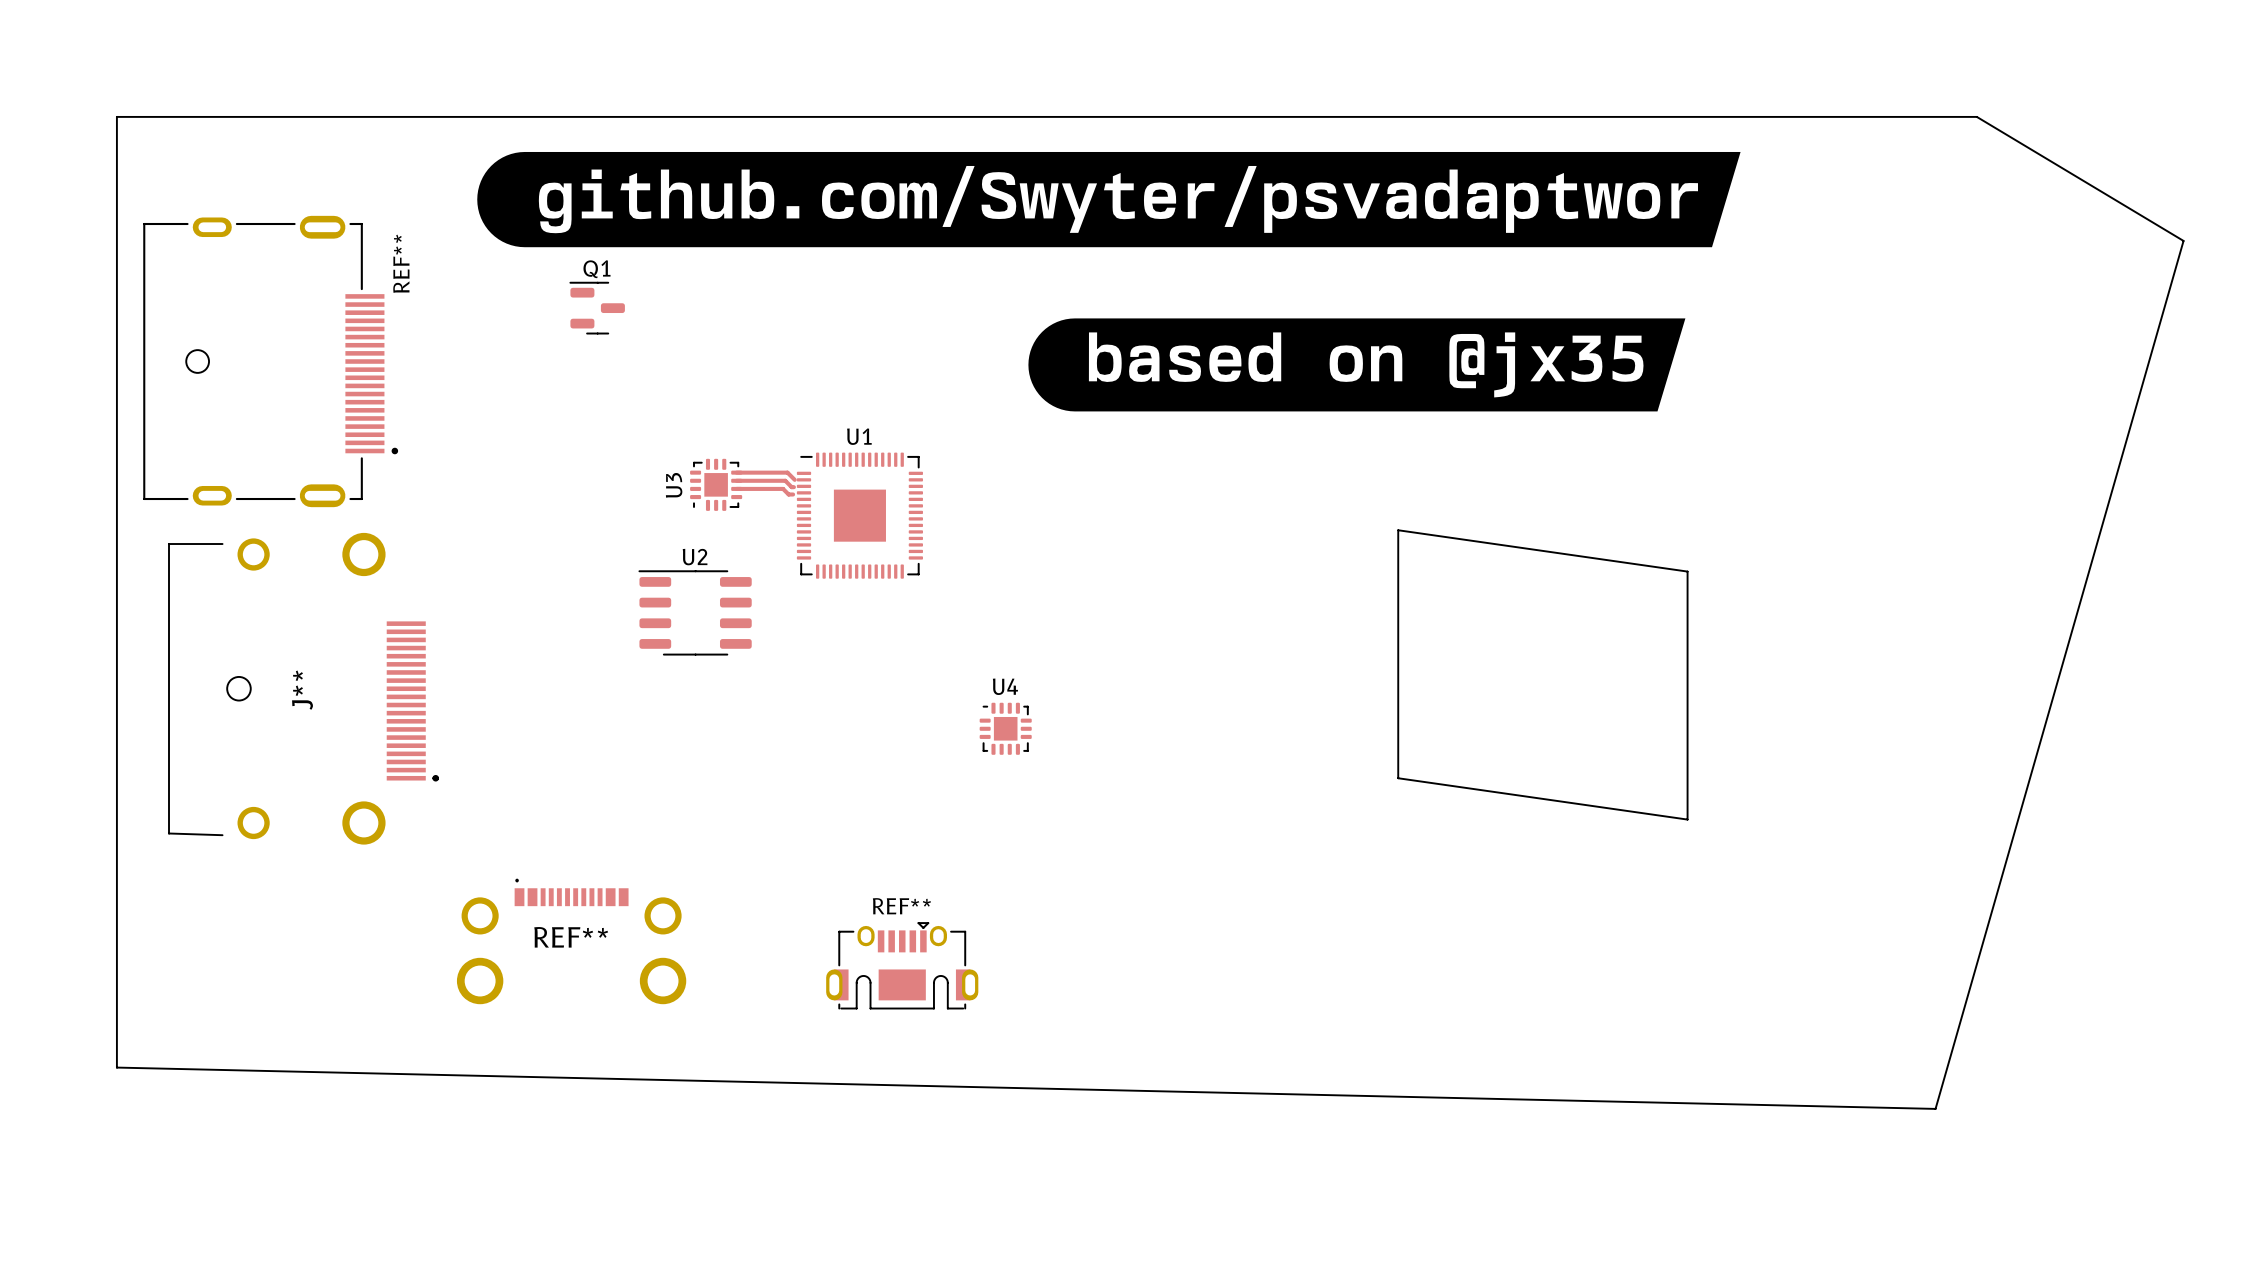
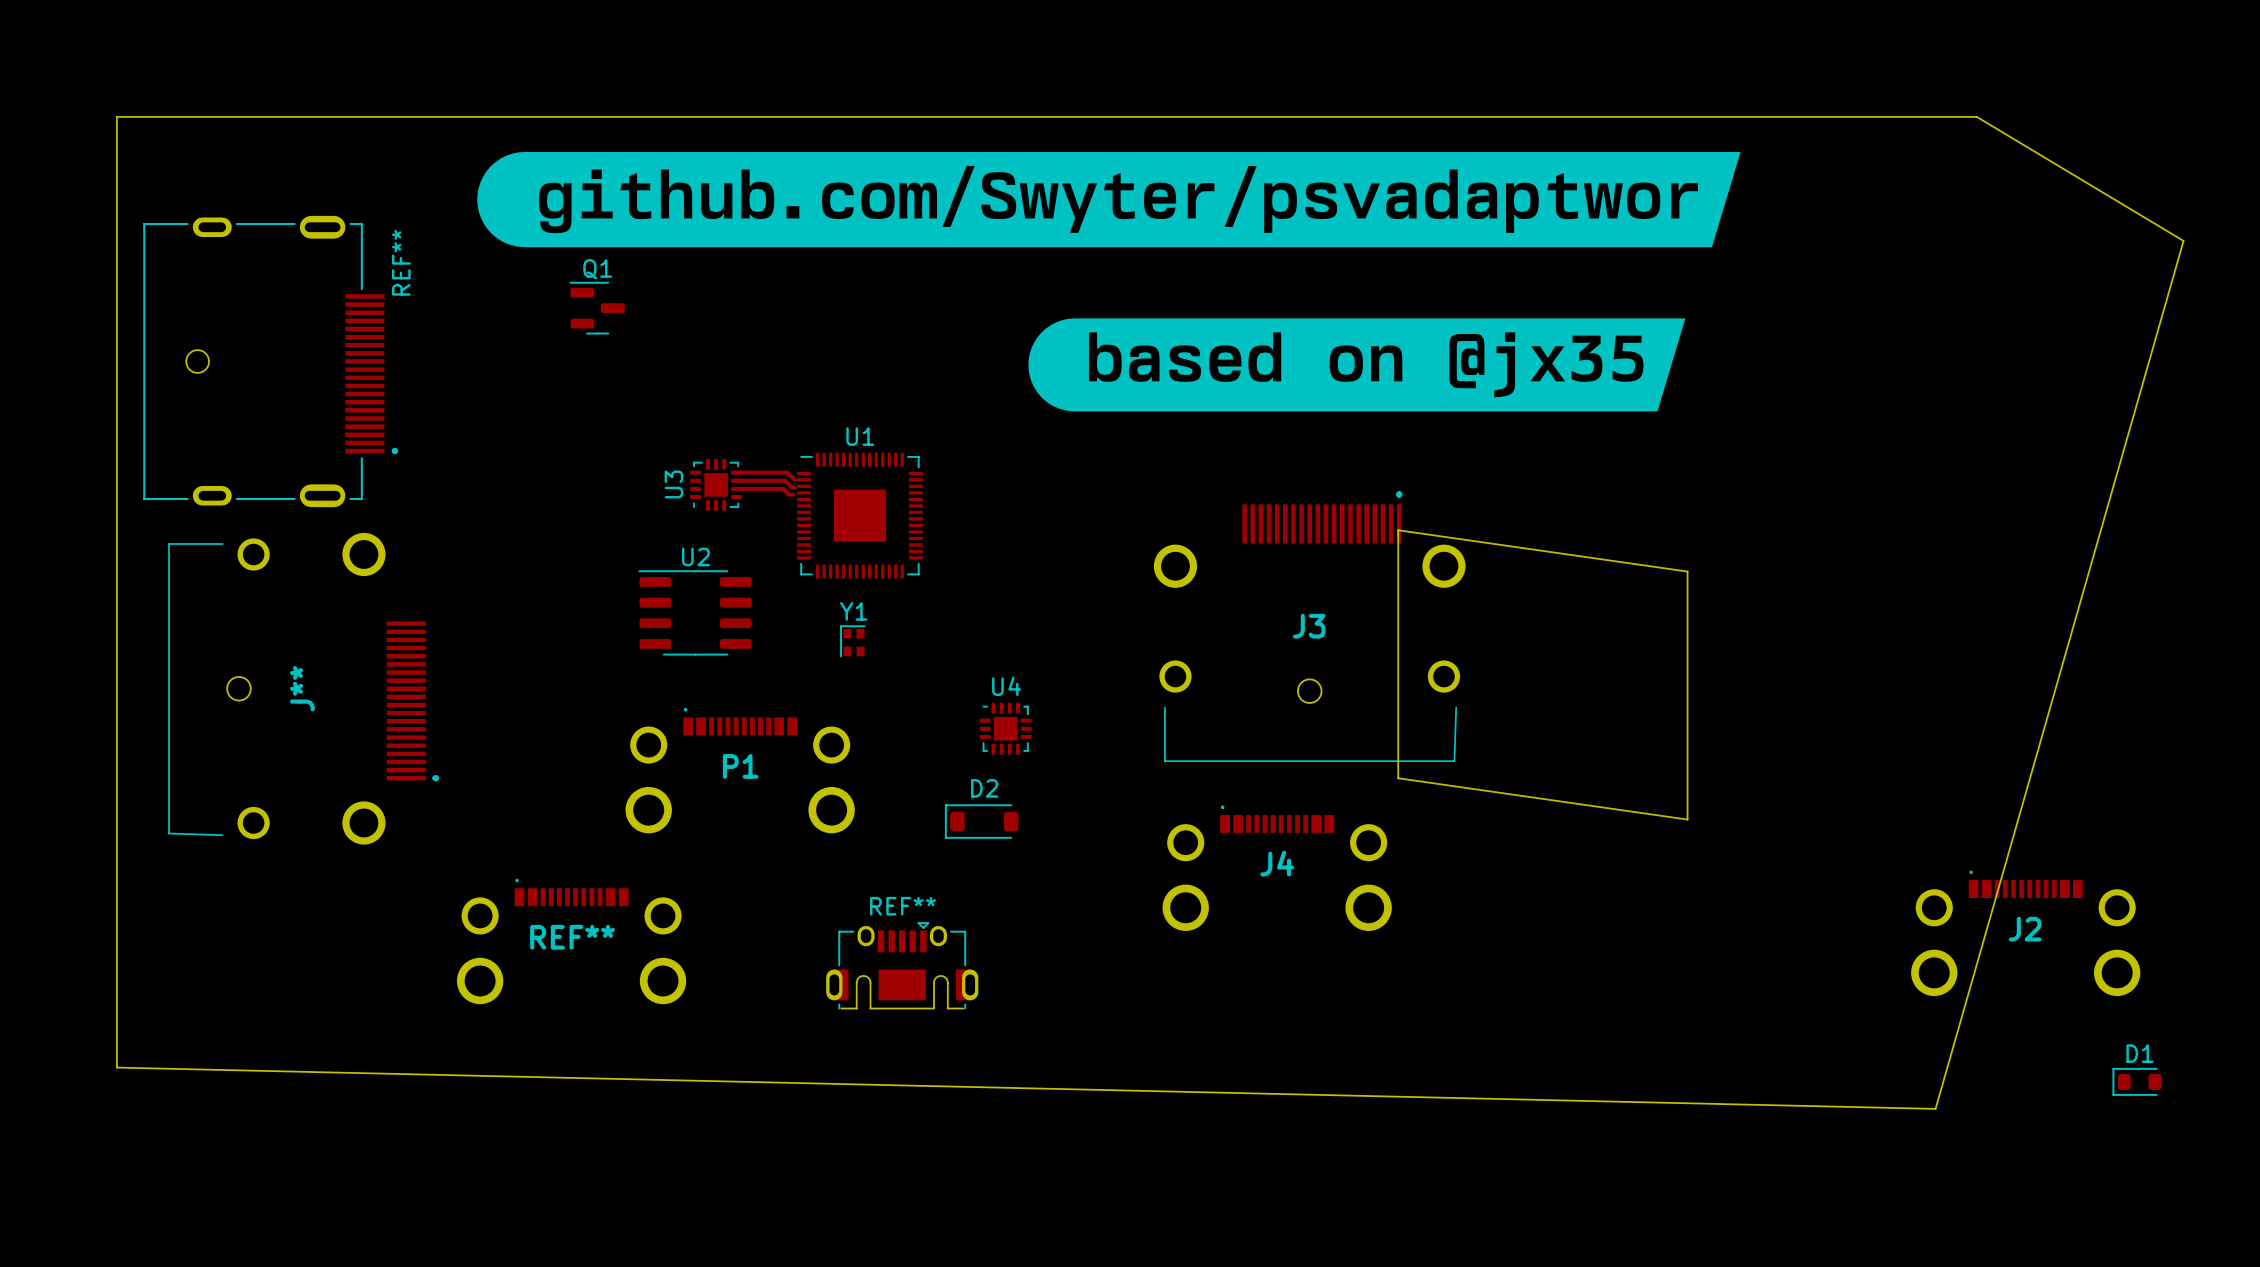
J3: none -> (1309, 626)
Y1: none -> (852, 641)
P1: none -> (740, 770)
D2: none -> (981, 821)
J4: none -> (1277, 868)
J2: none -> (2025, 933)
D1: none -> (2137, 1081)

